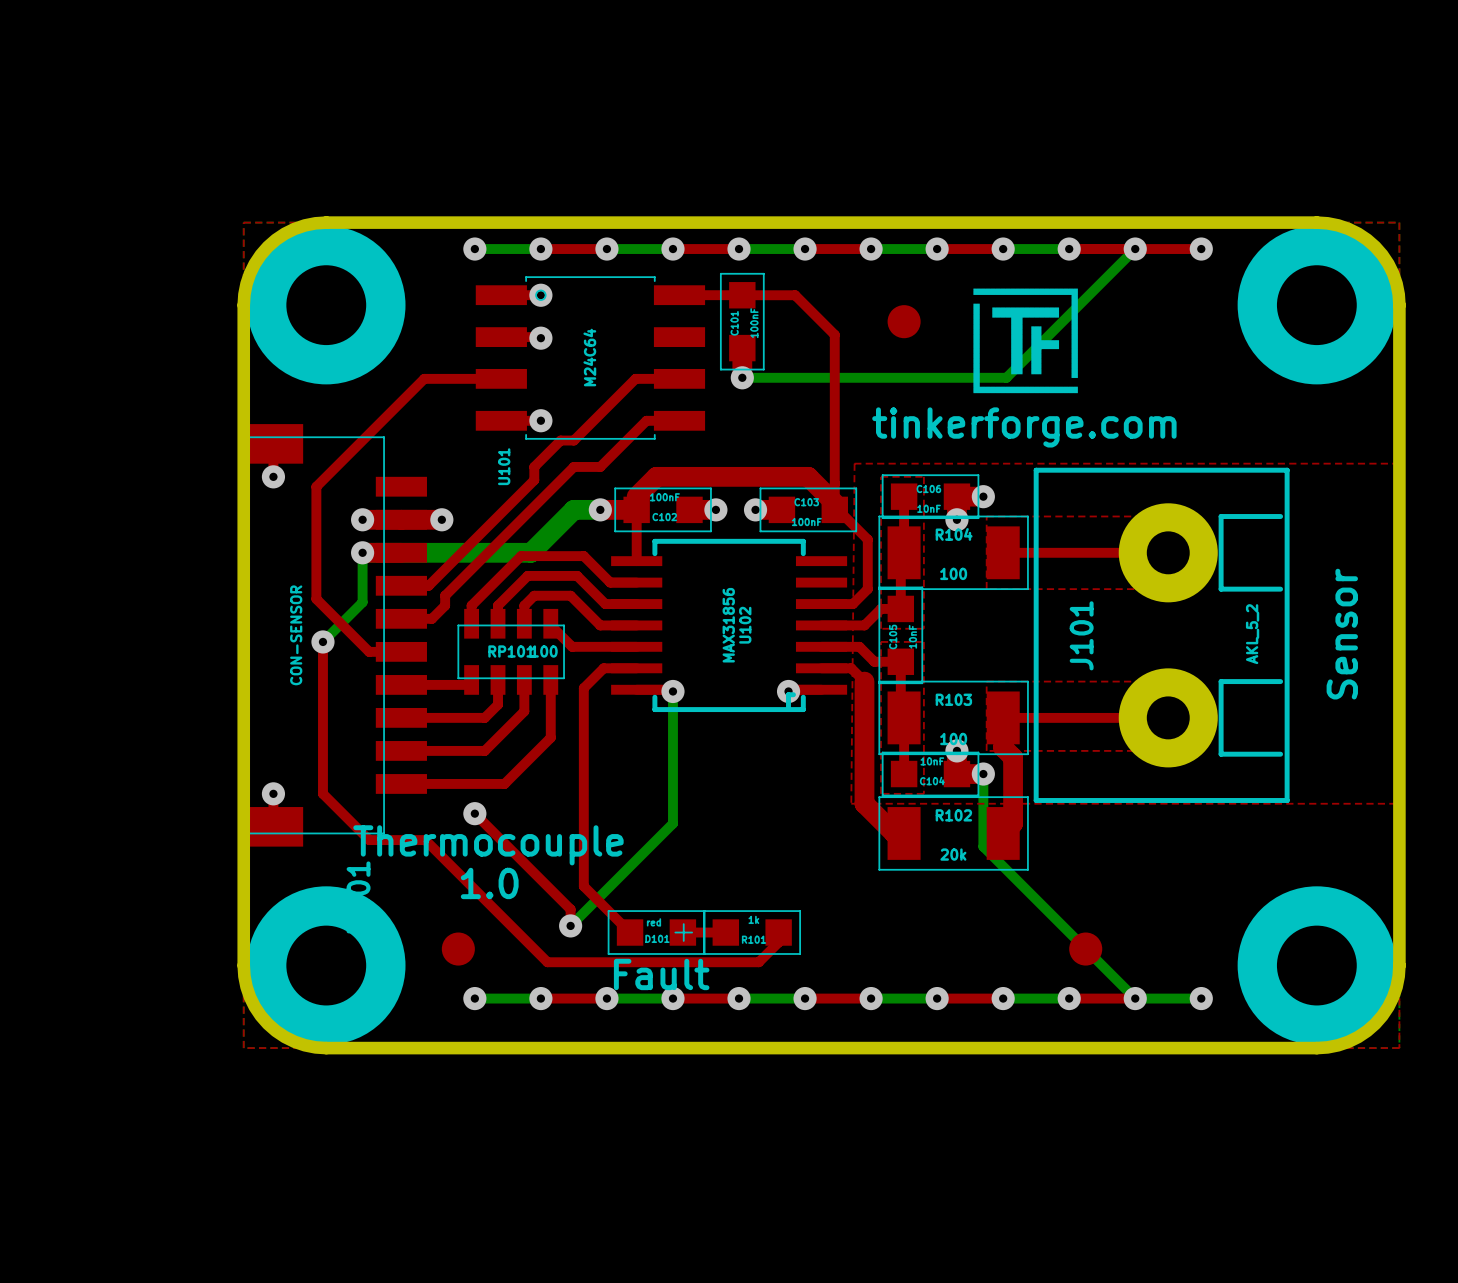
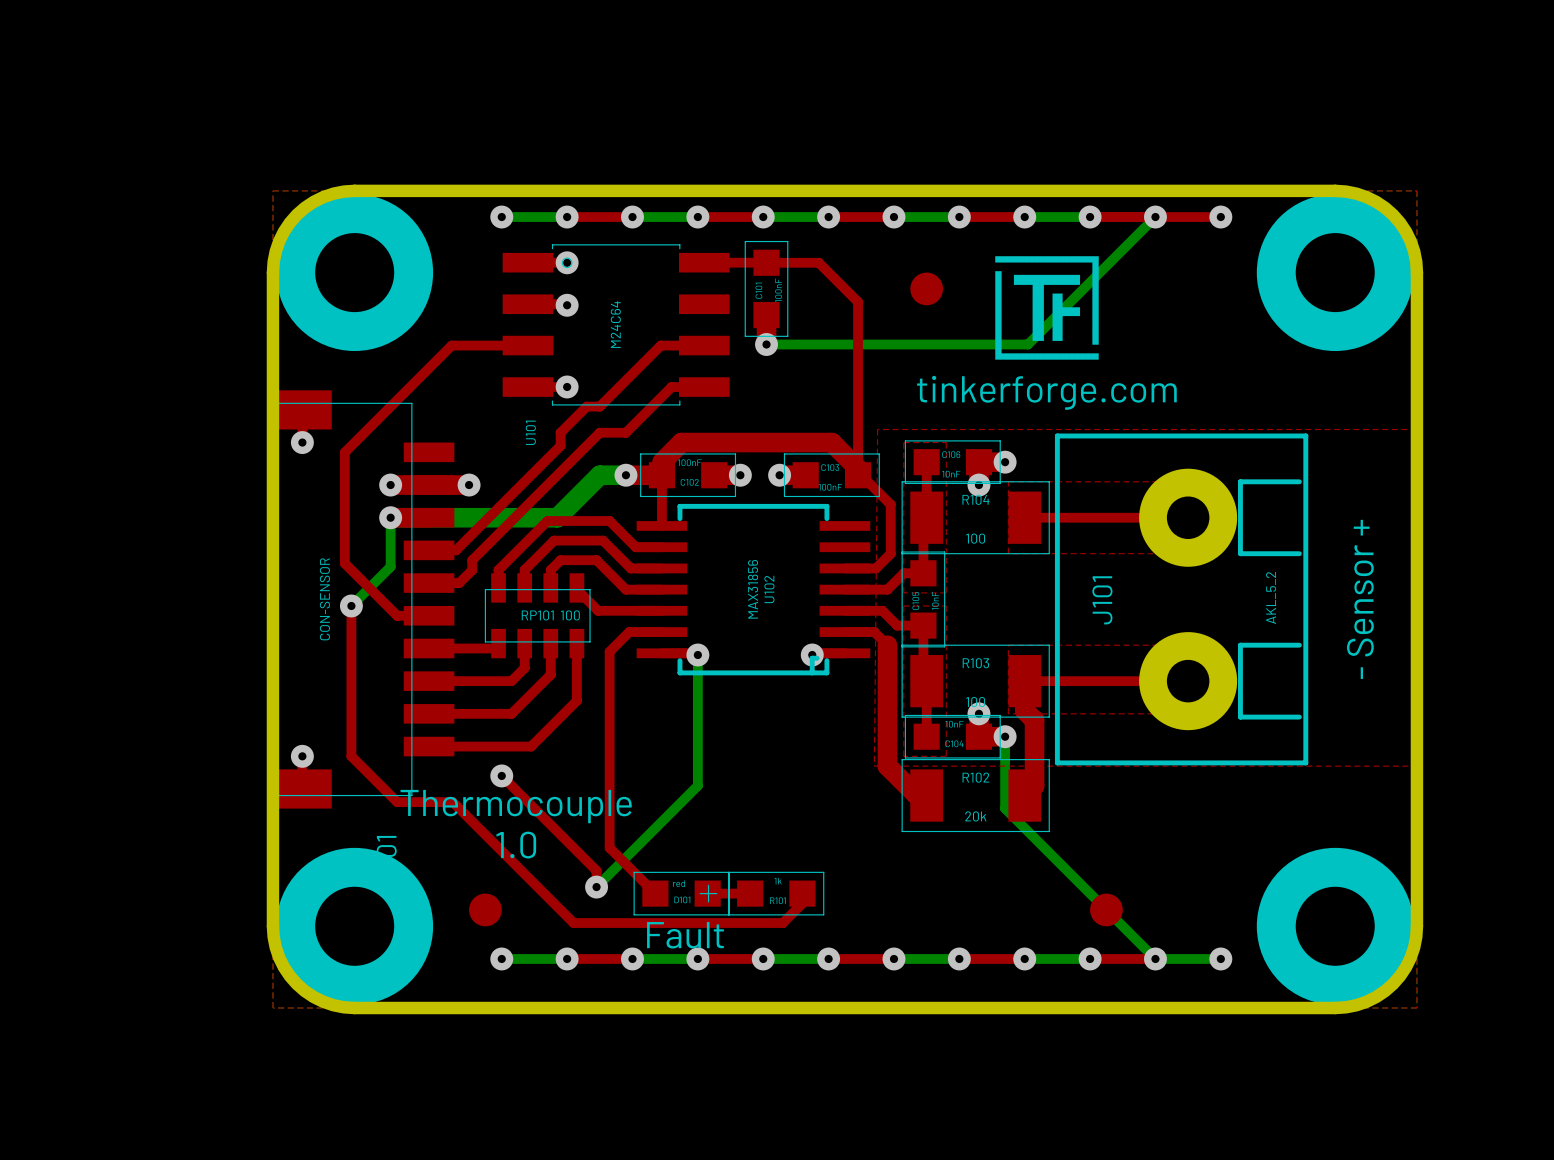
text: Sensor (1342, 634) -> - Sensor + (1360, 599)

